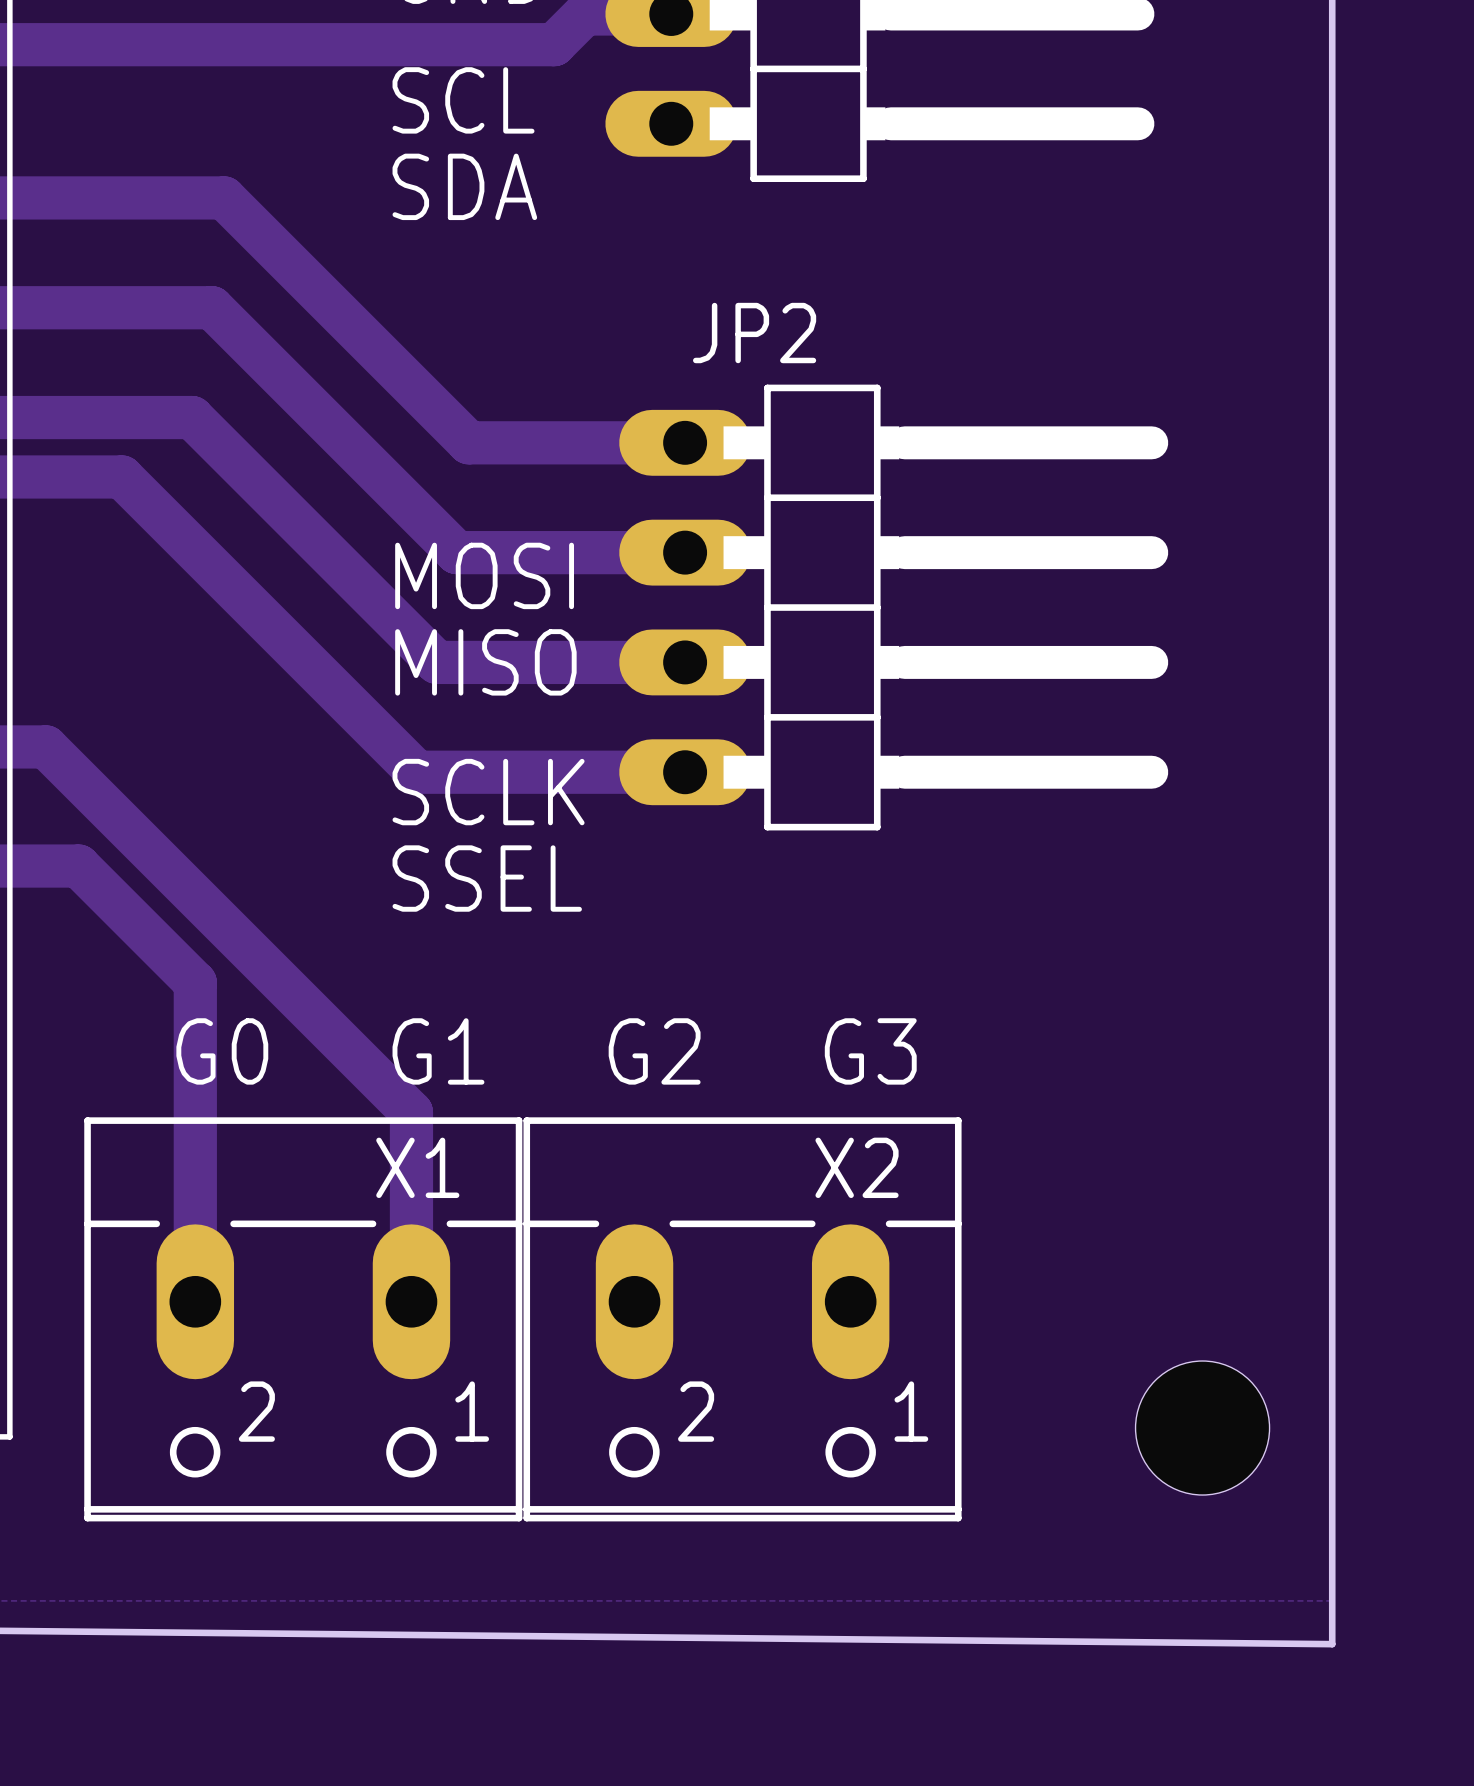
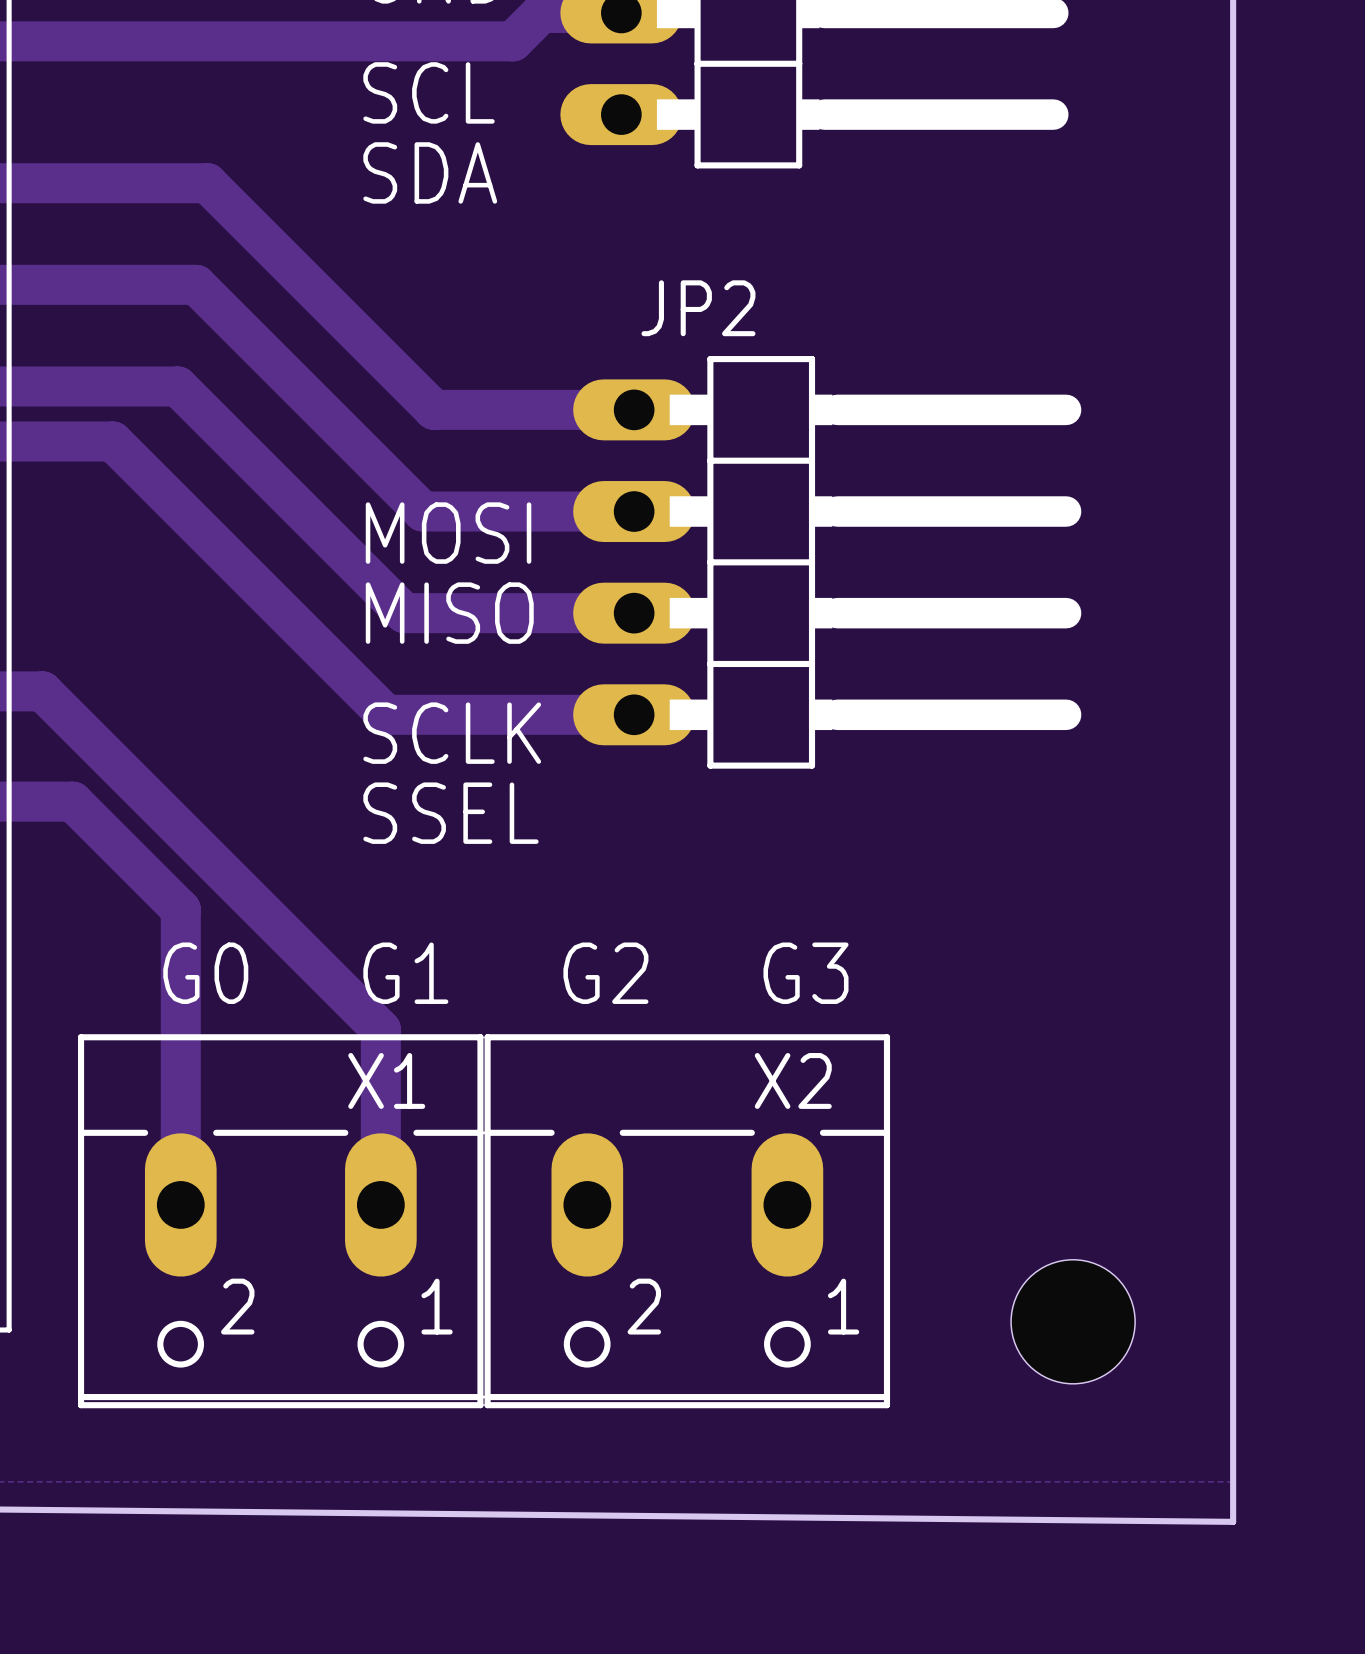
hole position: (1202, 1428) -> (1073, 1321)

